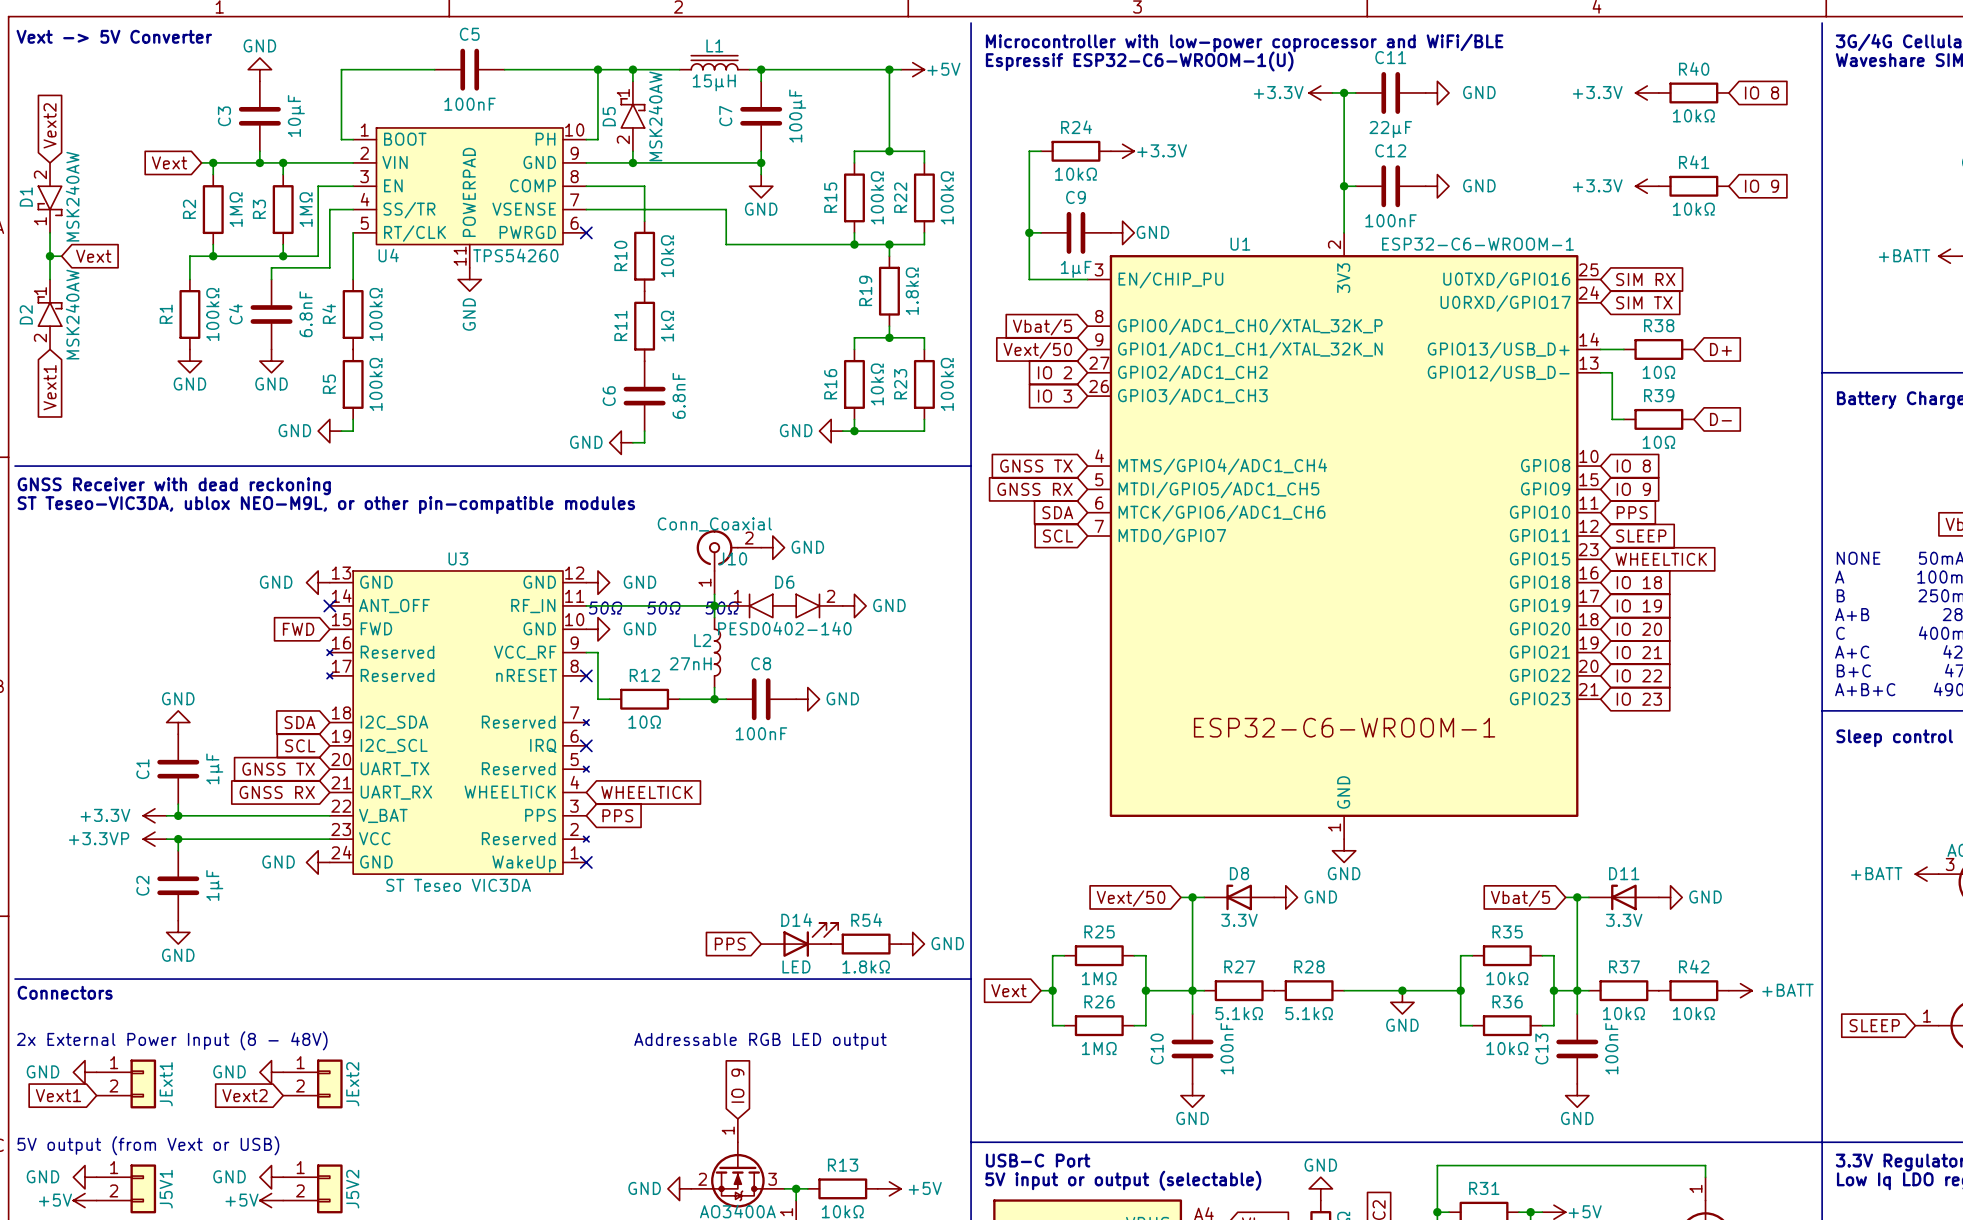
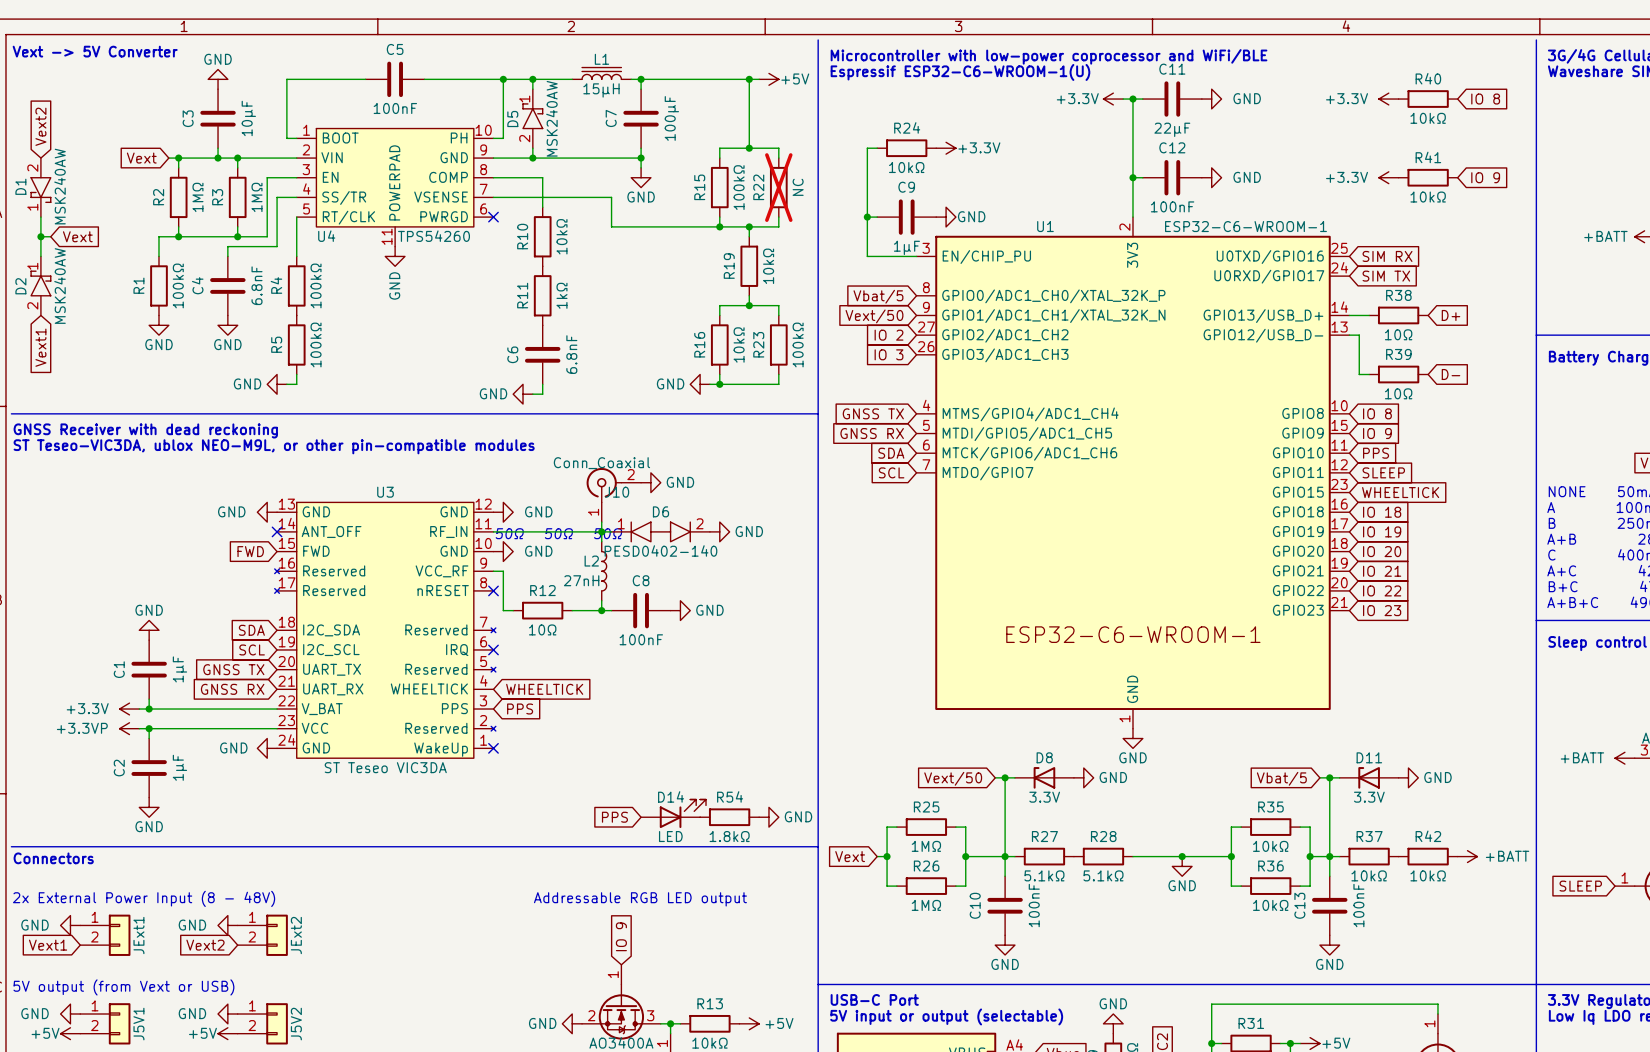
R22 do-not-place cross: none -> (778, 187)
R22 value: 100kΩ (947, 197) -> NC (798, 187)
R19 value: 1.8kΩ (912, 291) -> 10kΩ (768, 266)

